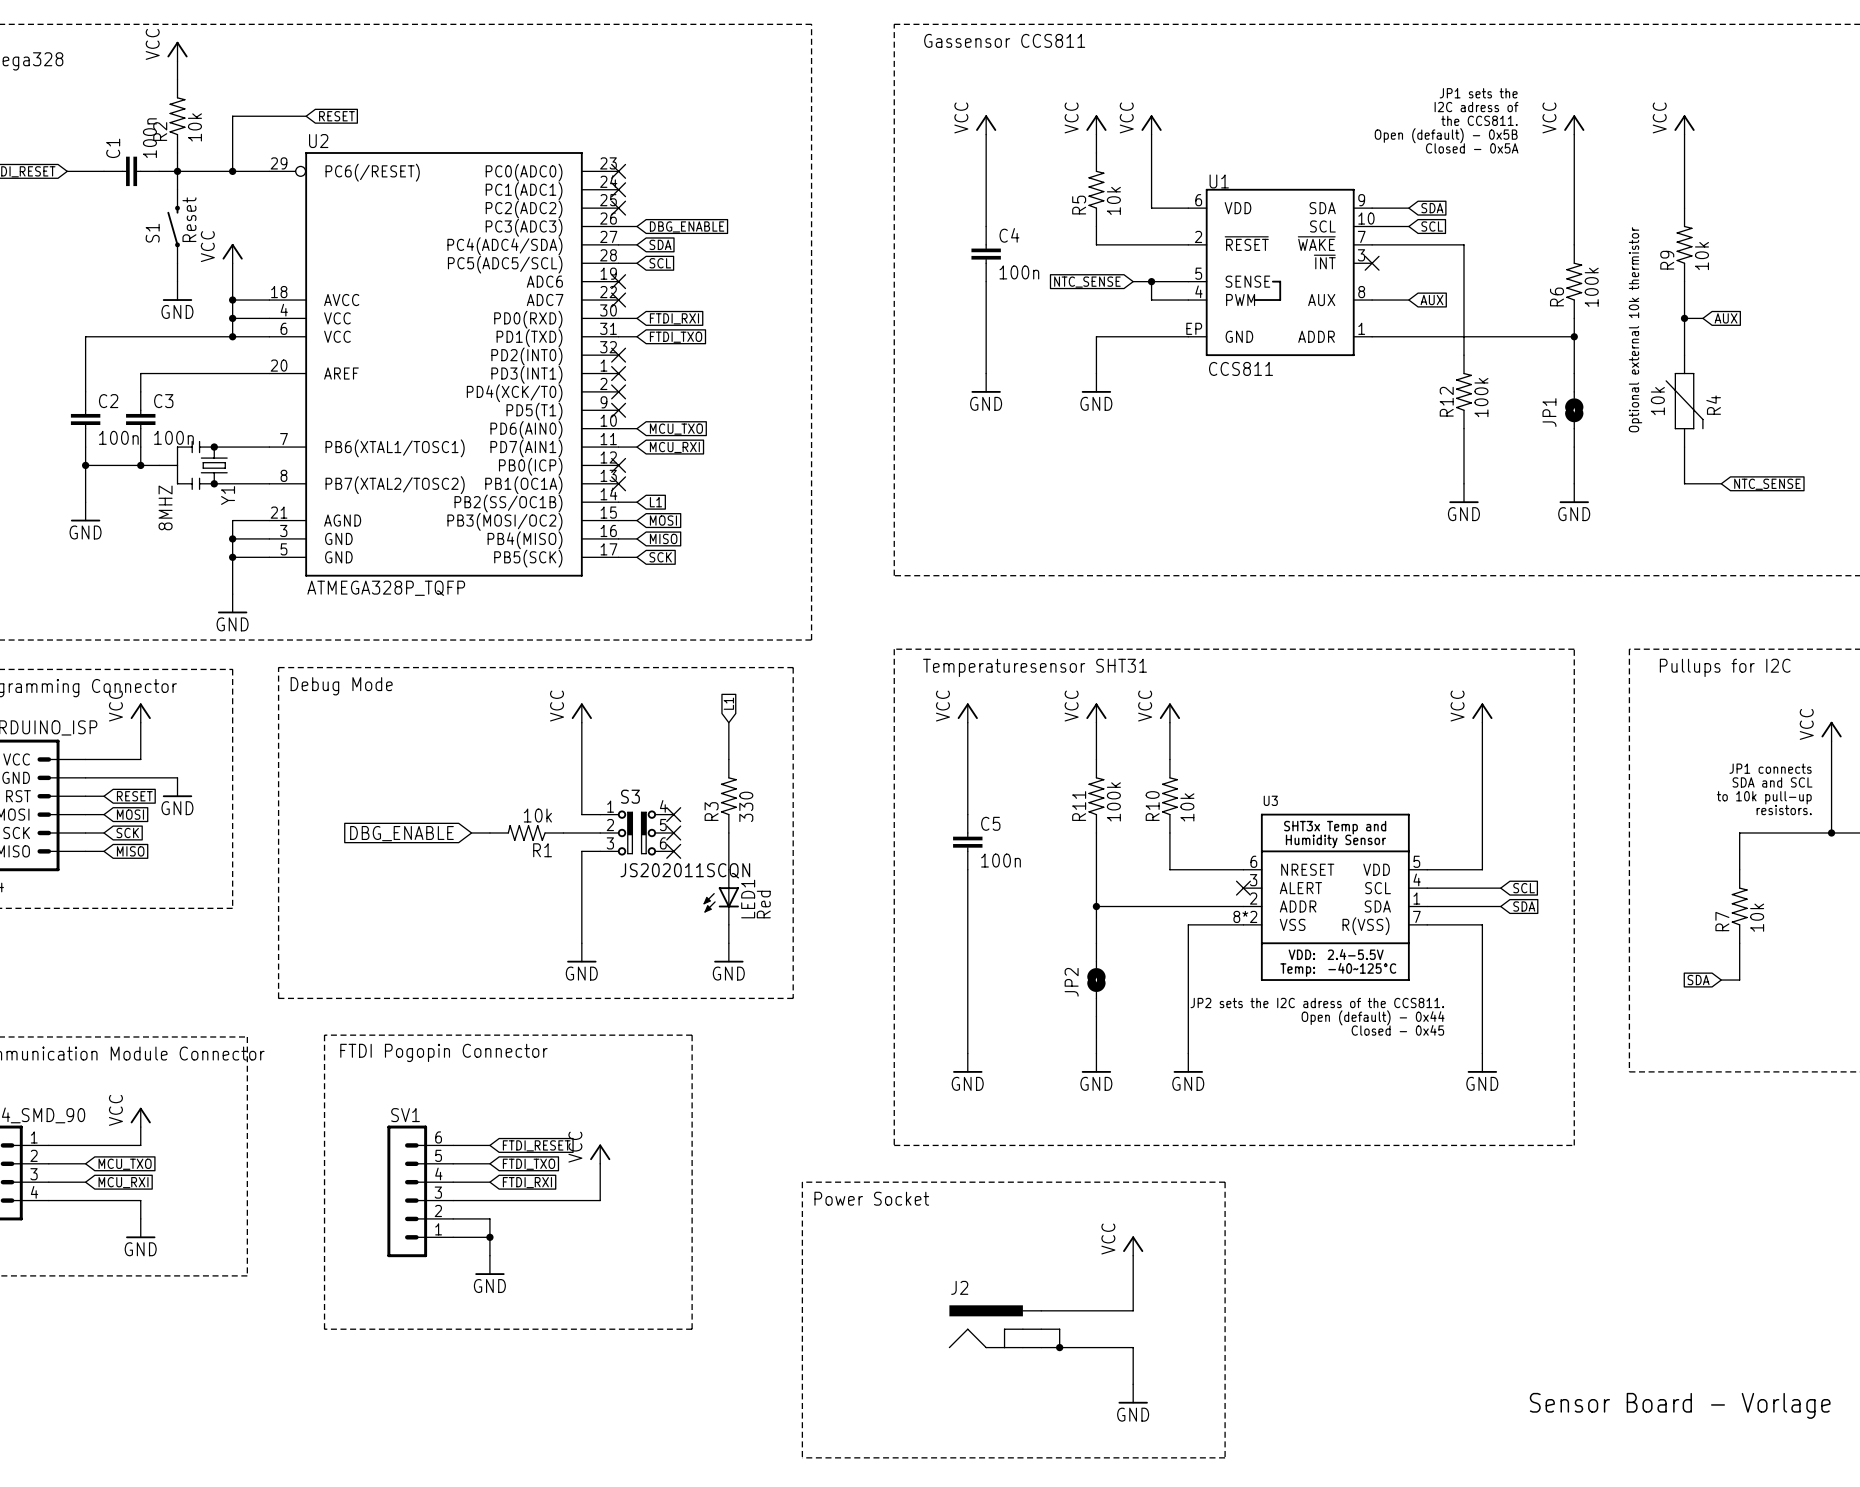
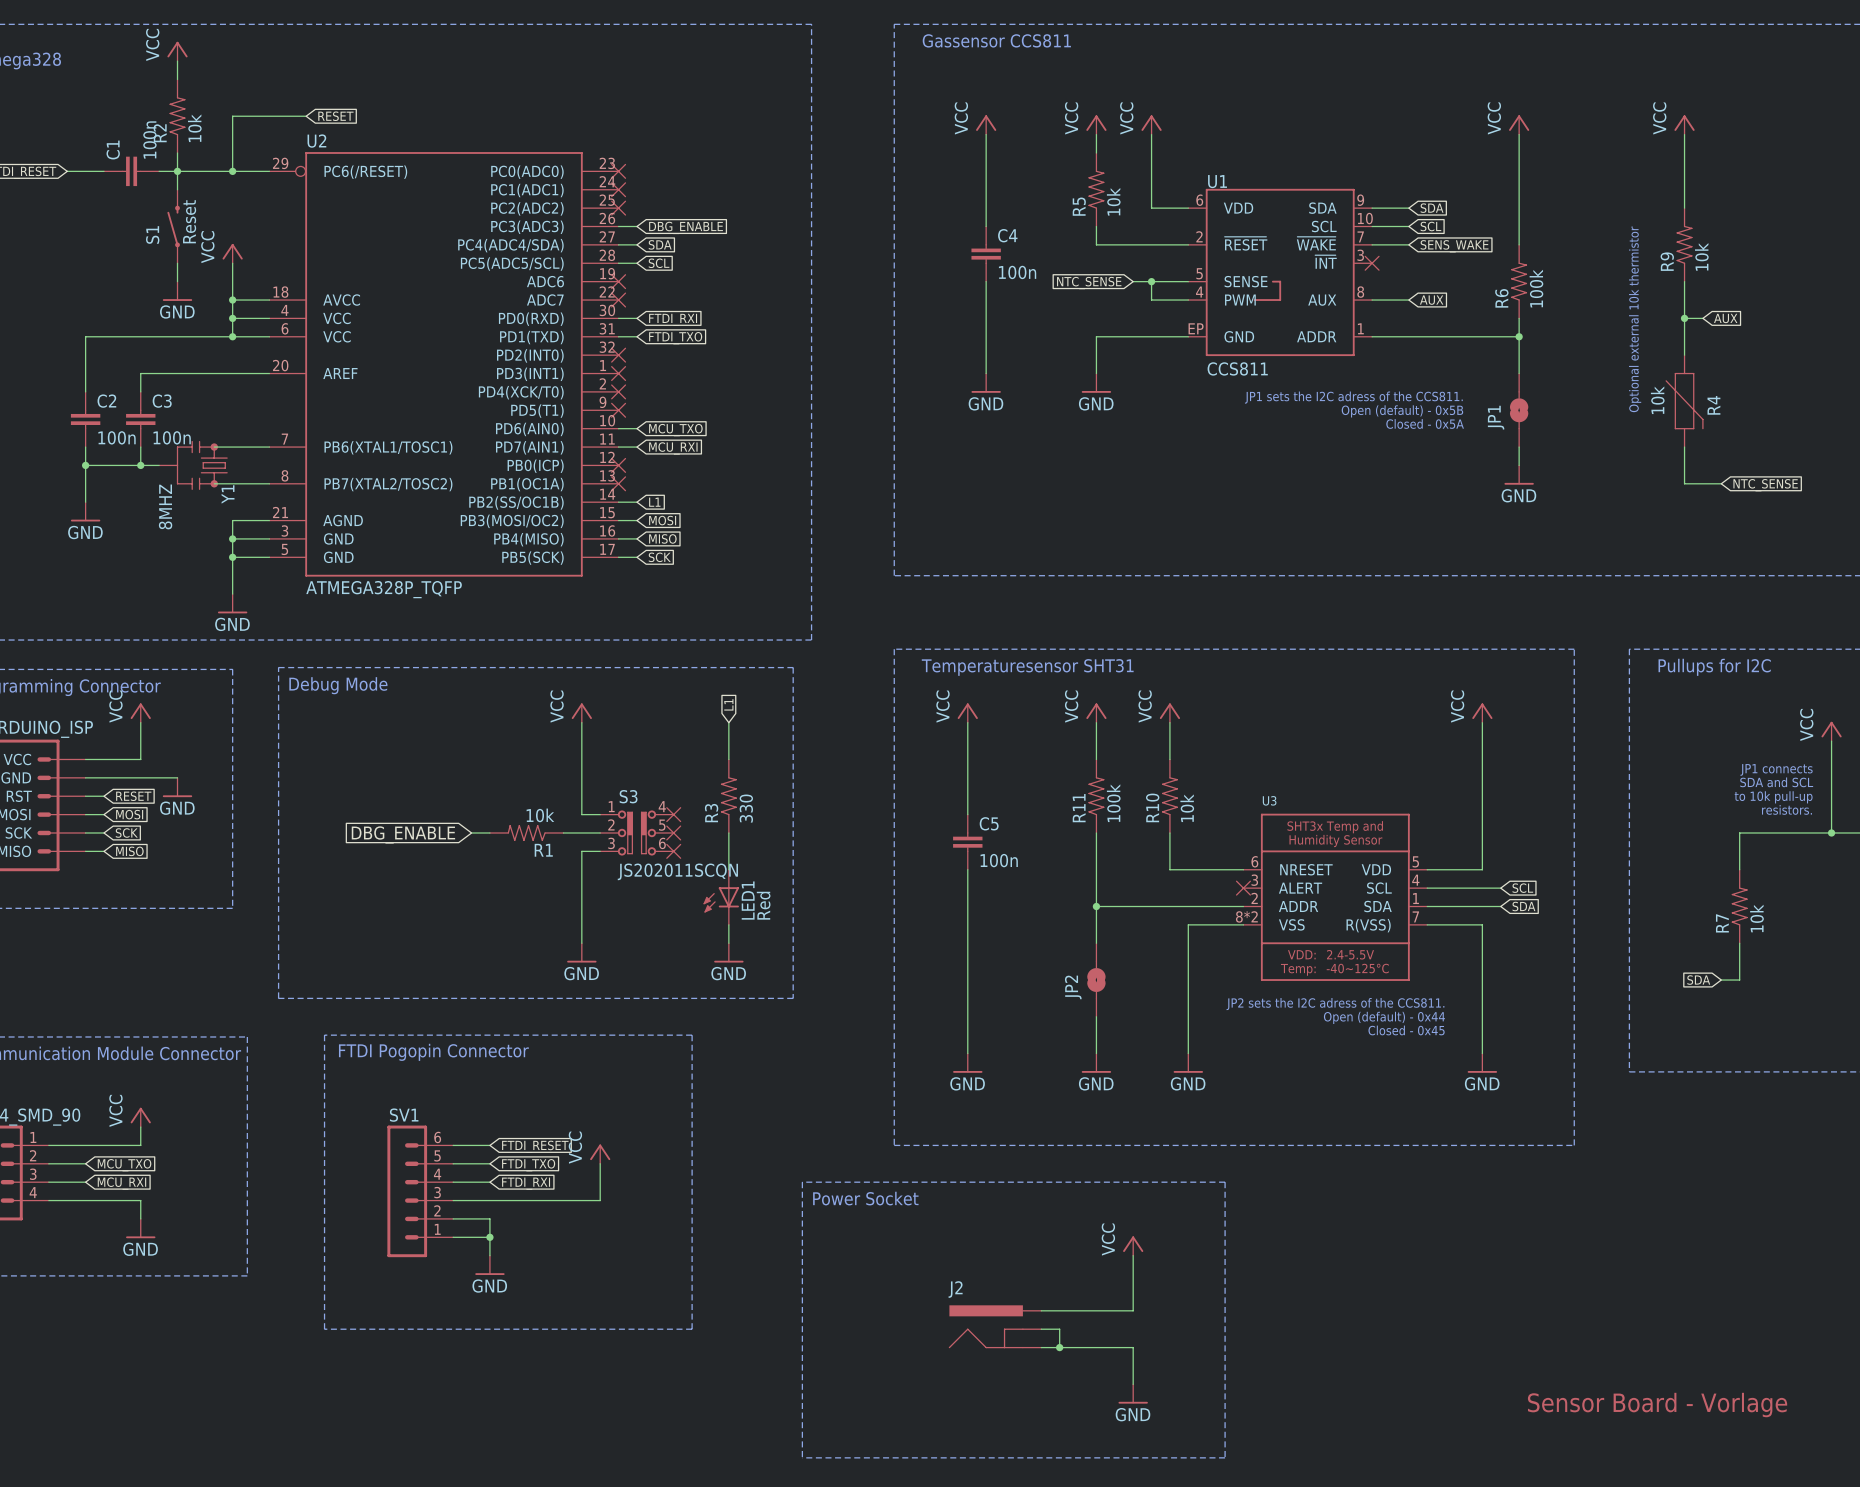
text: JP1 sets the (1478, 93) -> none
text: I2C adress of (1476, 107) -> none
text: the CCS811. (1479, 120) -> none
power symbol position: VCC (1574, 124) -> VCC (1519, 124)
wire: (1574, 134) (1574, 244) -> (1519, 134) (1519, 244)
text: Open (default) - 0x5B (1446, 135) -> none
text: Closed - 0x5A (1472, 148) -> none
wire: (1408, 244) (1463, 244) (1463, 355) -> none
global label: none -> SENS_WAKE (1454, 246)
R6 position: (1574, 281) -> (1519, 281)
wire: (1574, 318) (1574, 373) -> (1519, 318) (1519, 373)
wire: (1519, 336) (1574, 336) -> none
junction: none -> (1519, 336)
junction: (1574, 336) -> none
R12: 100k (1463, 391) -> none
text: none -> JP1 sets the I2C adress of the CCS811. (1353, 397)
JP1 position: (1574, 410) -> (1519, 410)
text: none -> Open (default) - 0x5B (1402, 411)
text: none -> Closed - 0x5A (1425, 423)
wire: (1463, 428) (1463, 483) -> none
wire: none -> (1519, 447) (1519, 465)
wire: (1574, 447) (1574, 483) -> none
power symbol: none -> GND (1519, 475)
power symbol: GND (1463, 493) -> none
power symbol: GND (1574, 493) -> none

